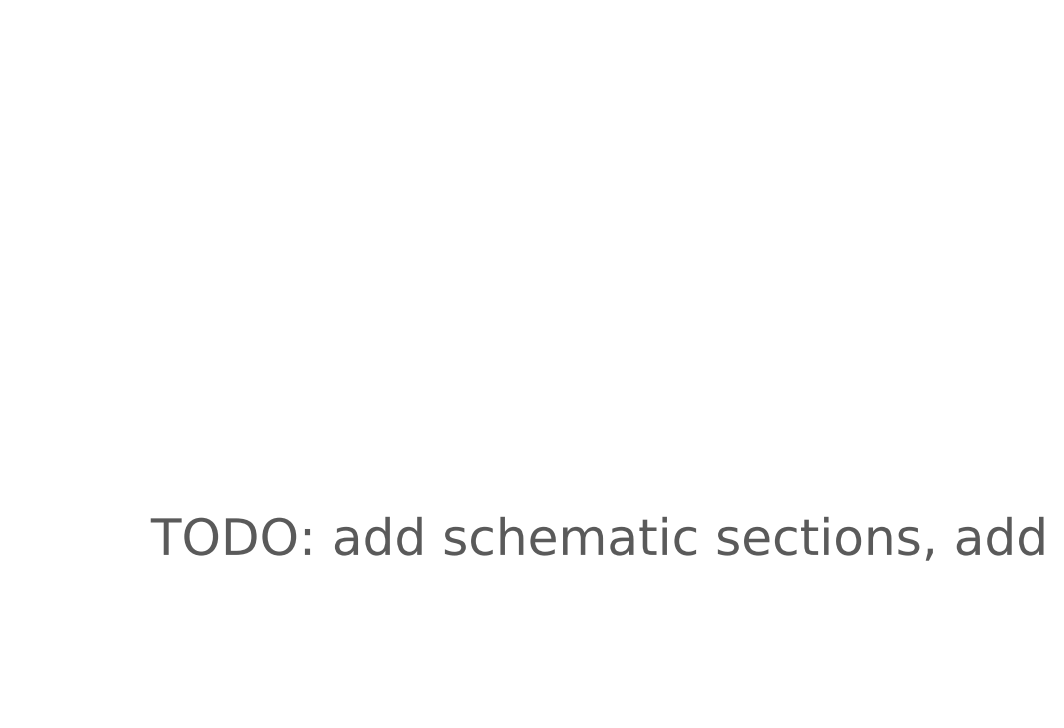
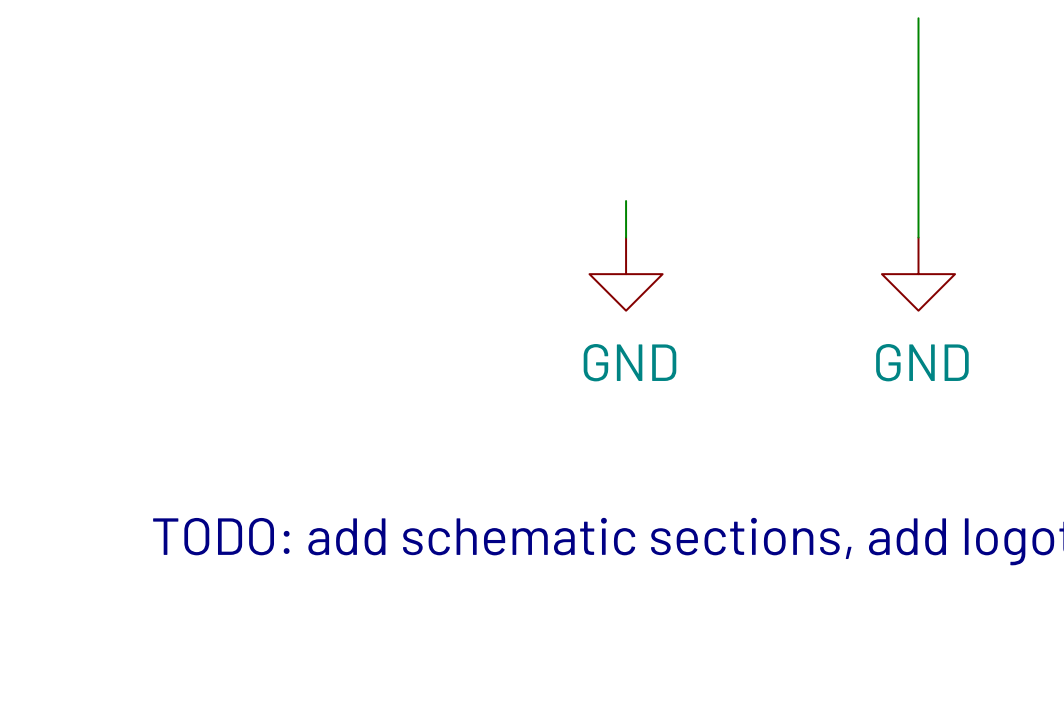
wire: none -> (918, 18) (918, 237)
wire: none -> (626, 201) (626, 237)
power symbol: none -> GND (626, 274)
power symbol: none -> GND (918, 274)

